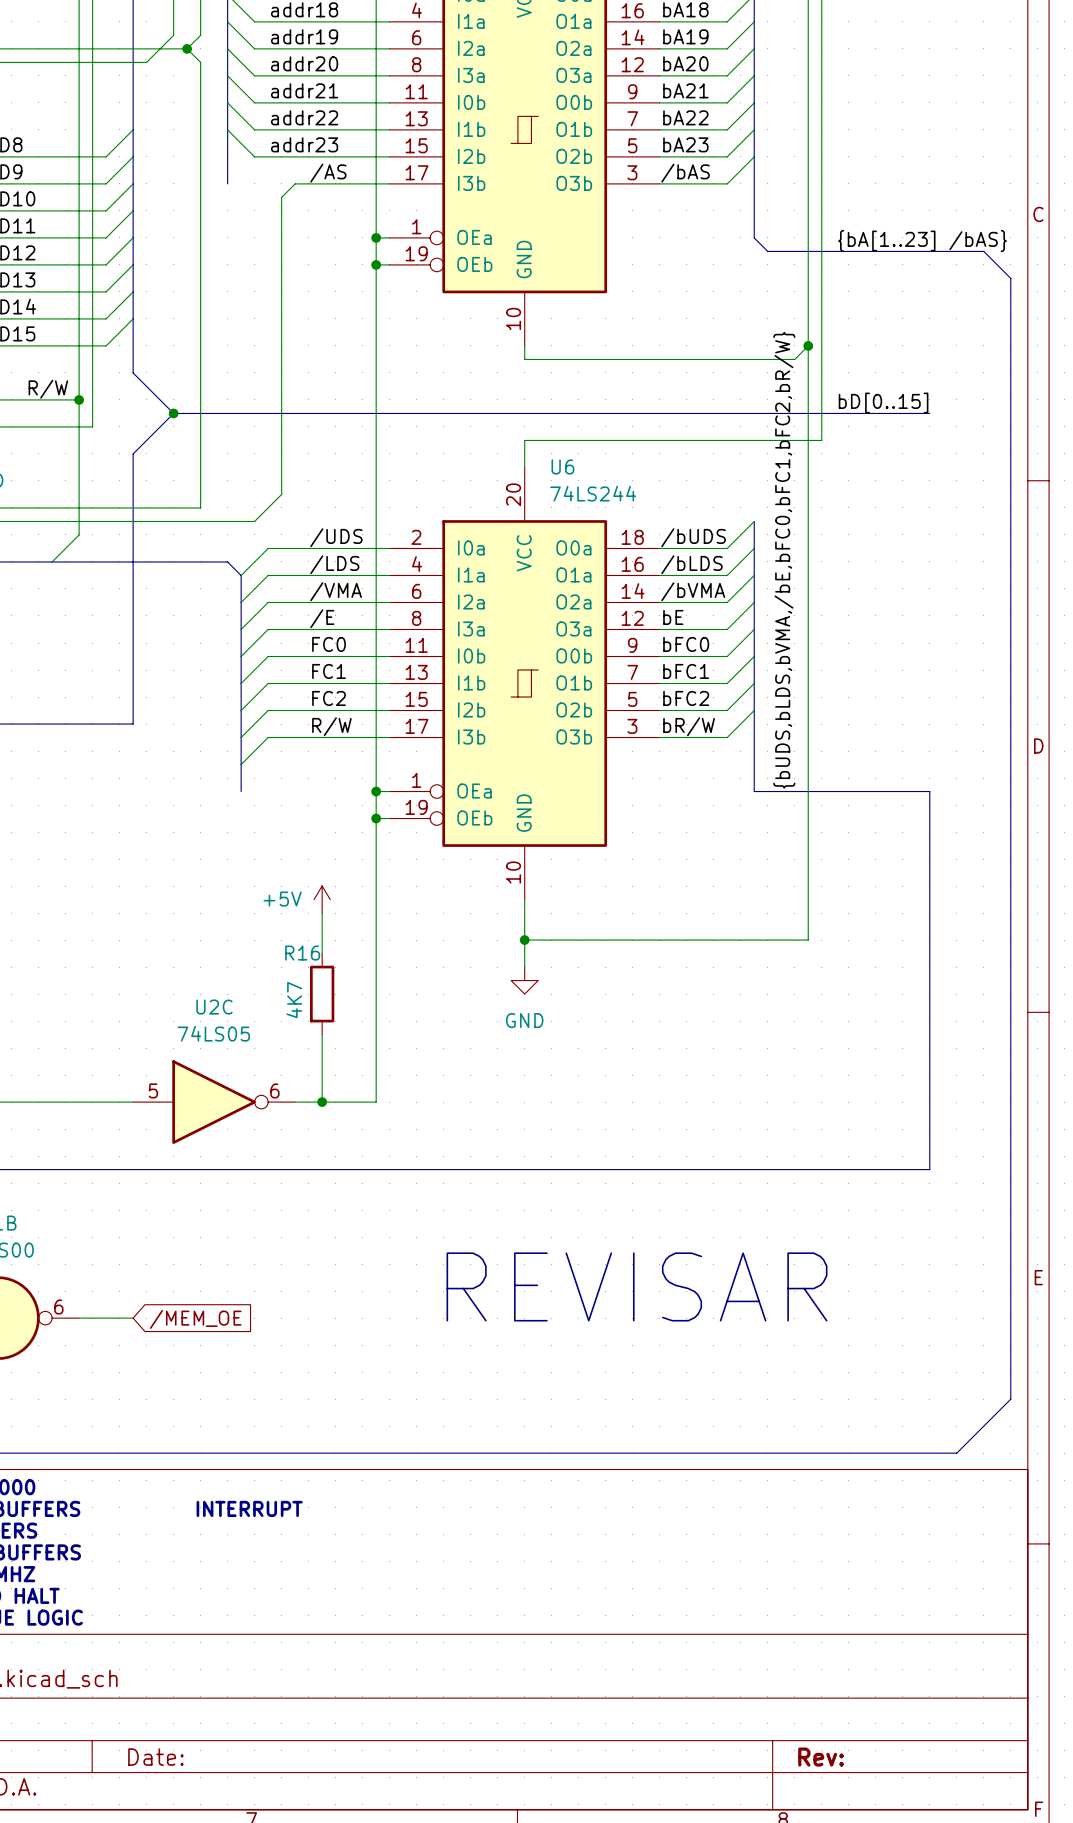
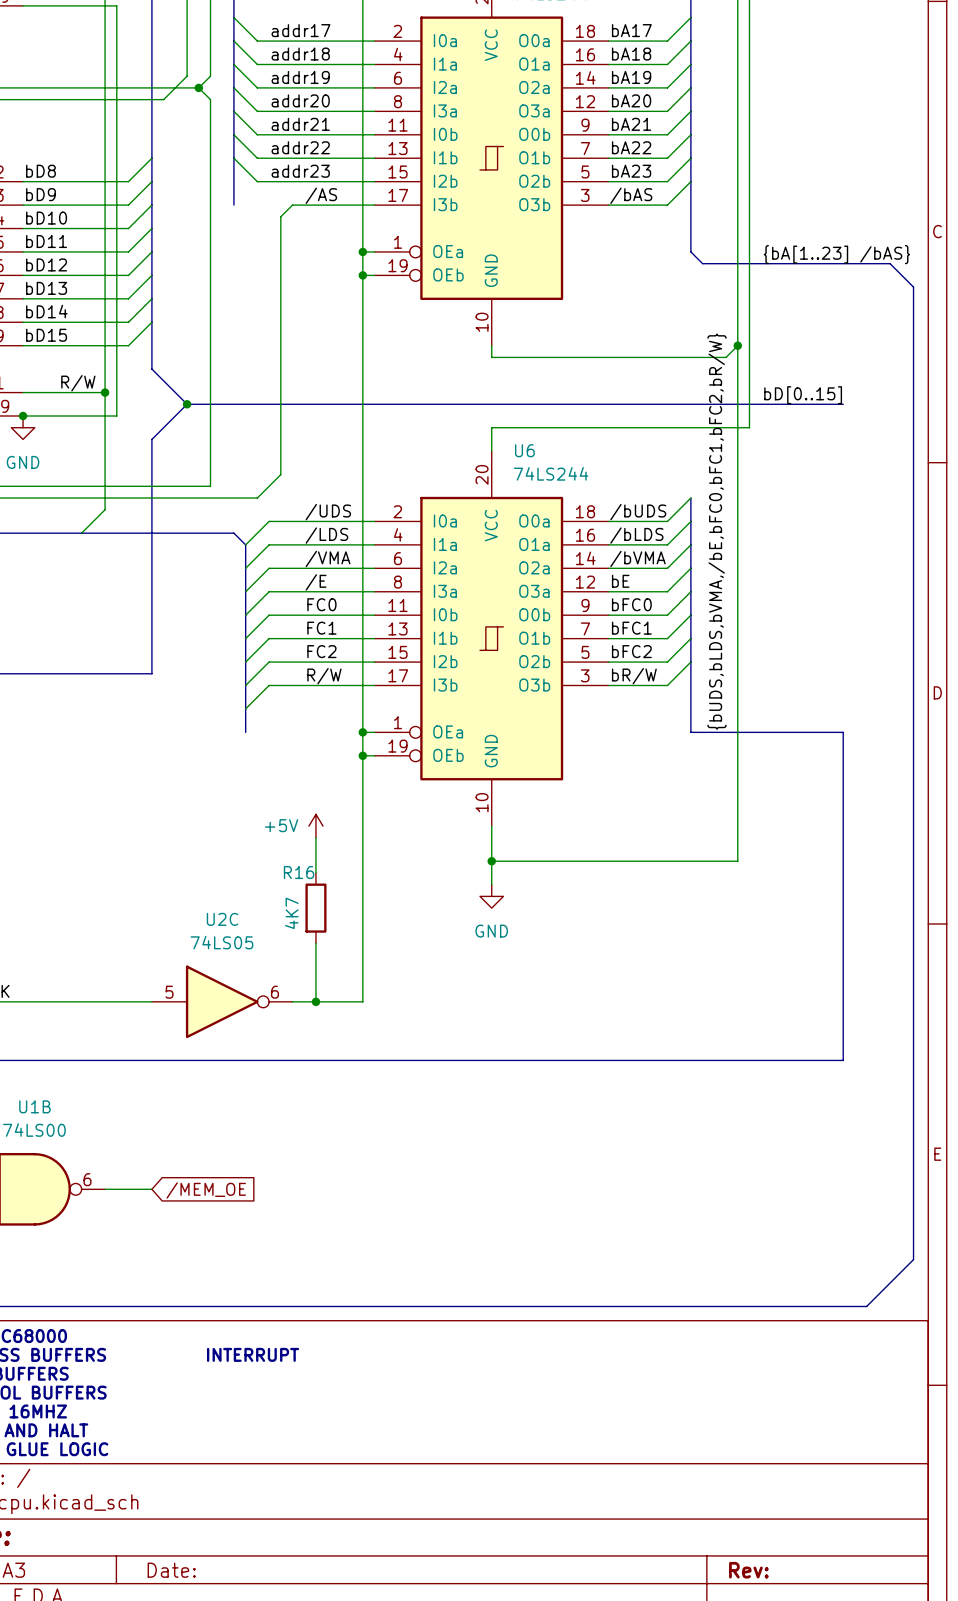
text: REVISAR (637, 1286) -> none

